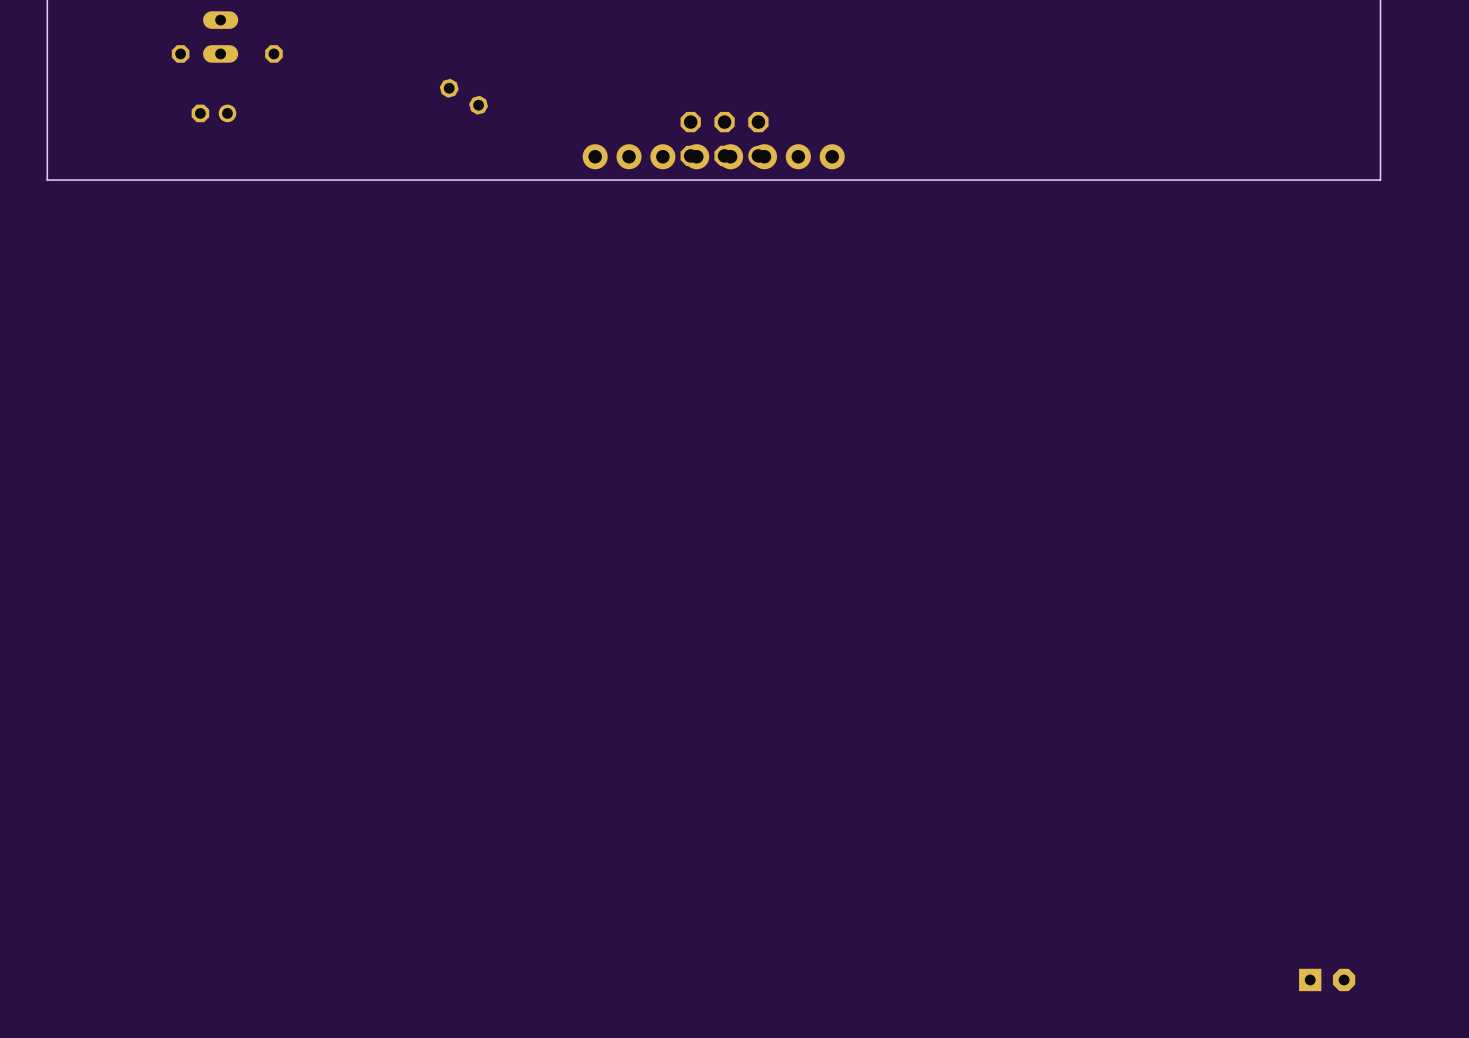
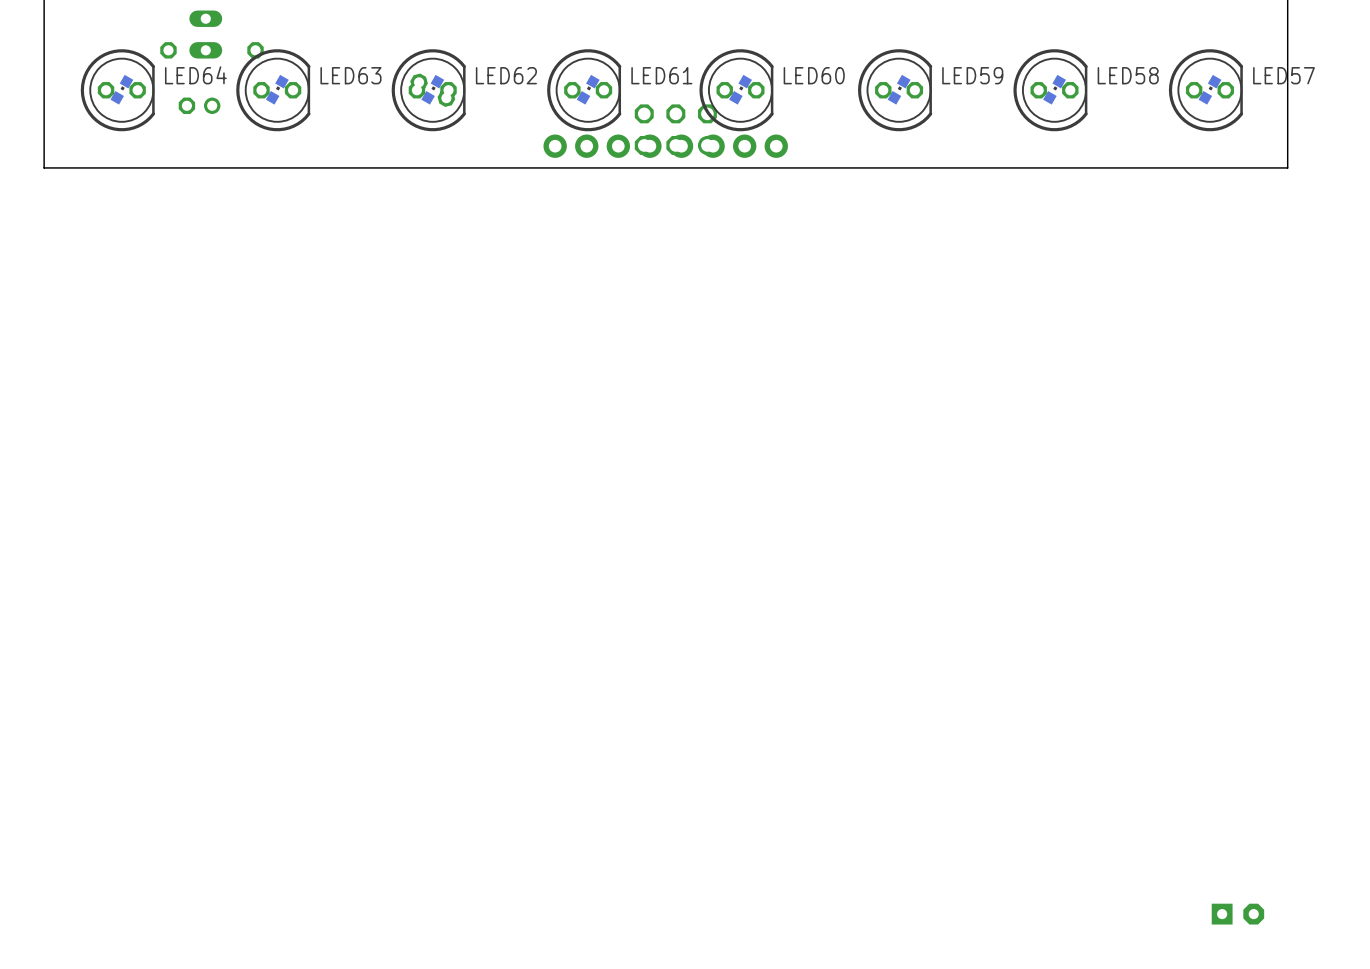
LED64: none -> (117, 90)
LED63: none -> (273, 90)
LED62: none -> (428, 90)
LED61: none -> (584, 90)
LED60: none -> (736, 90)
LED59: none -> (895, 90)
LED58: none -> (1050, 90)
LED57: none -> (1206, 90)

